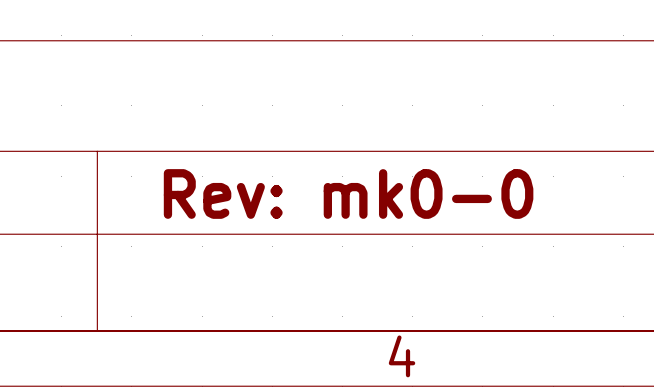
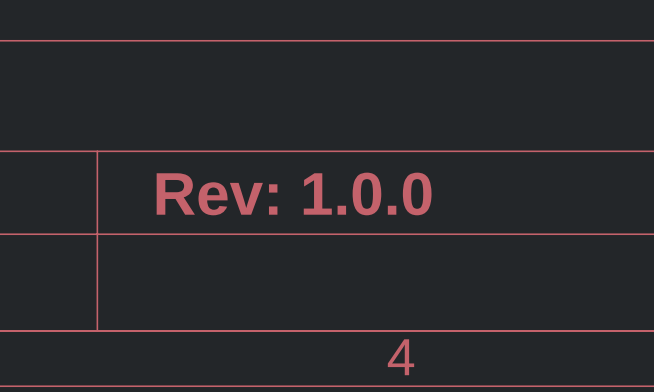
title block: Rev: mk0-0 (348, 193) -> Rev: 1.0.0 (294, 193)

